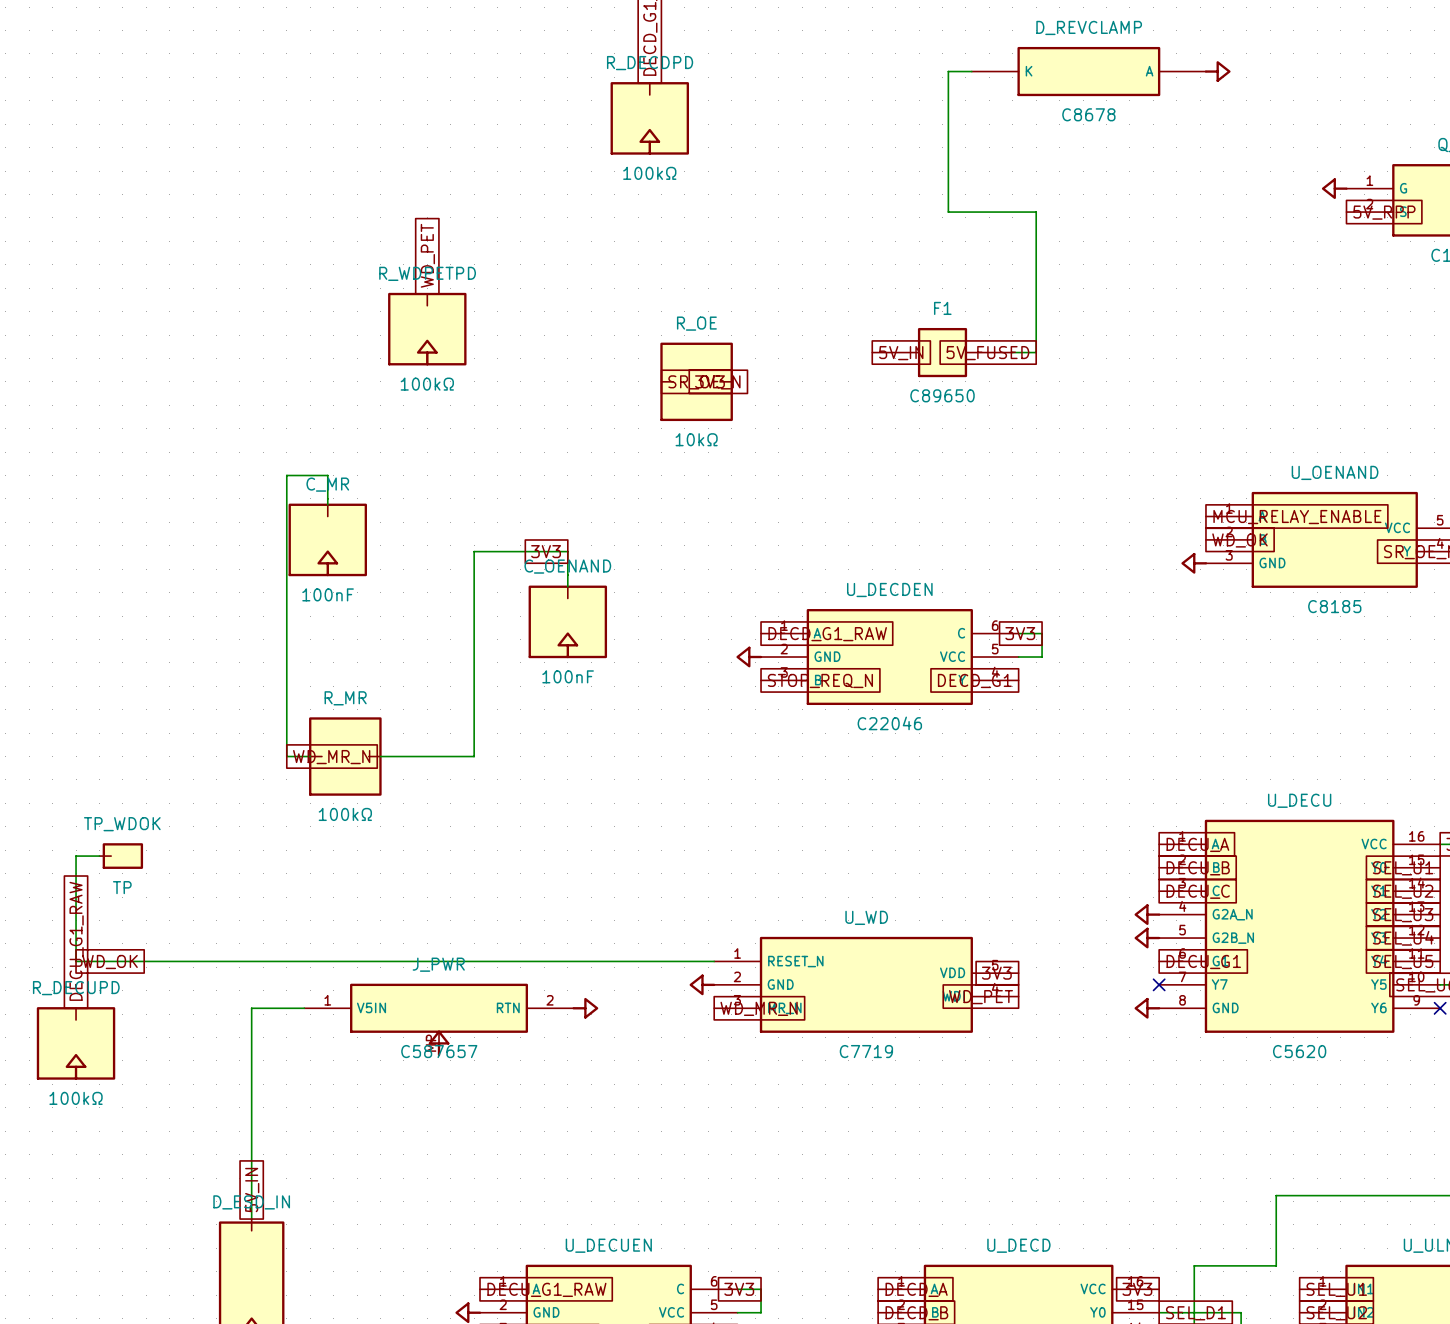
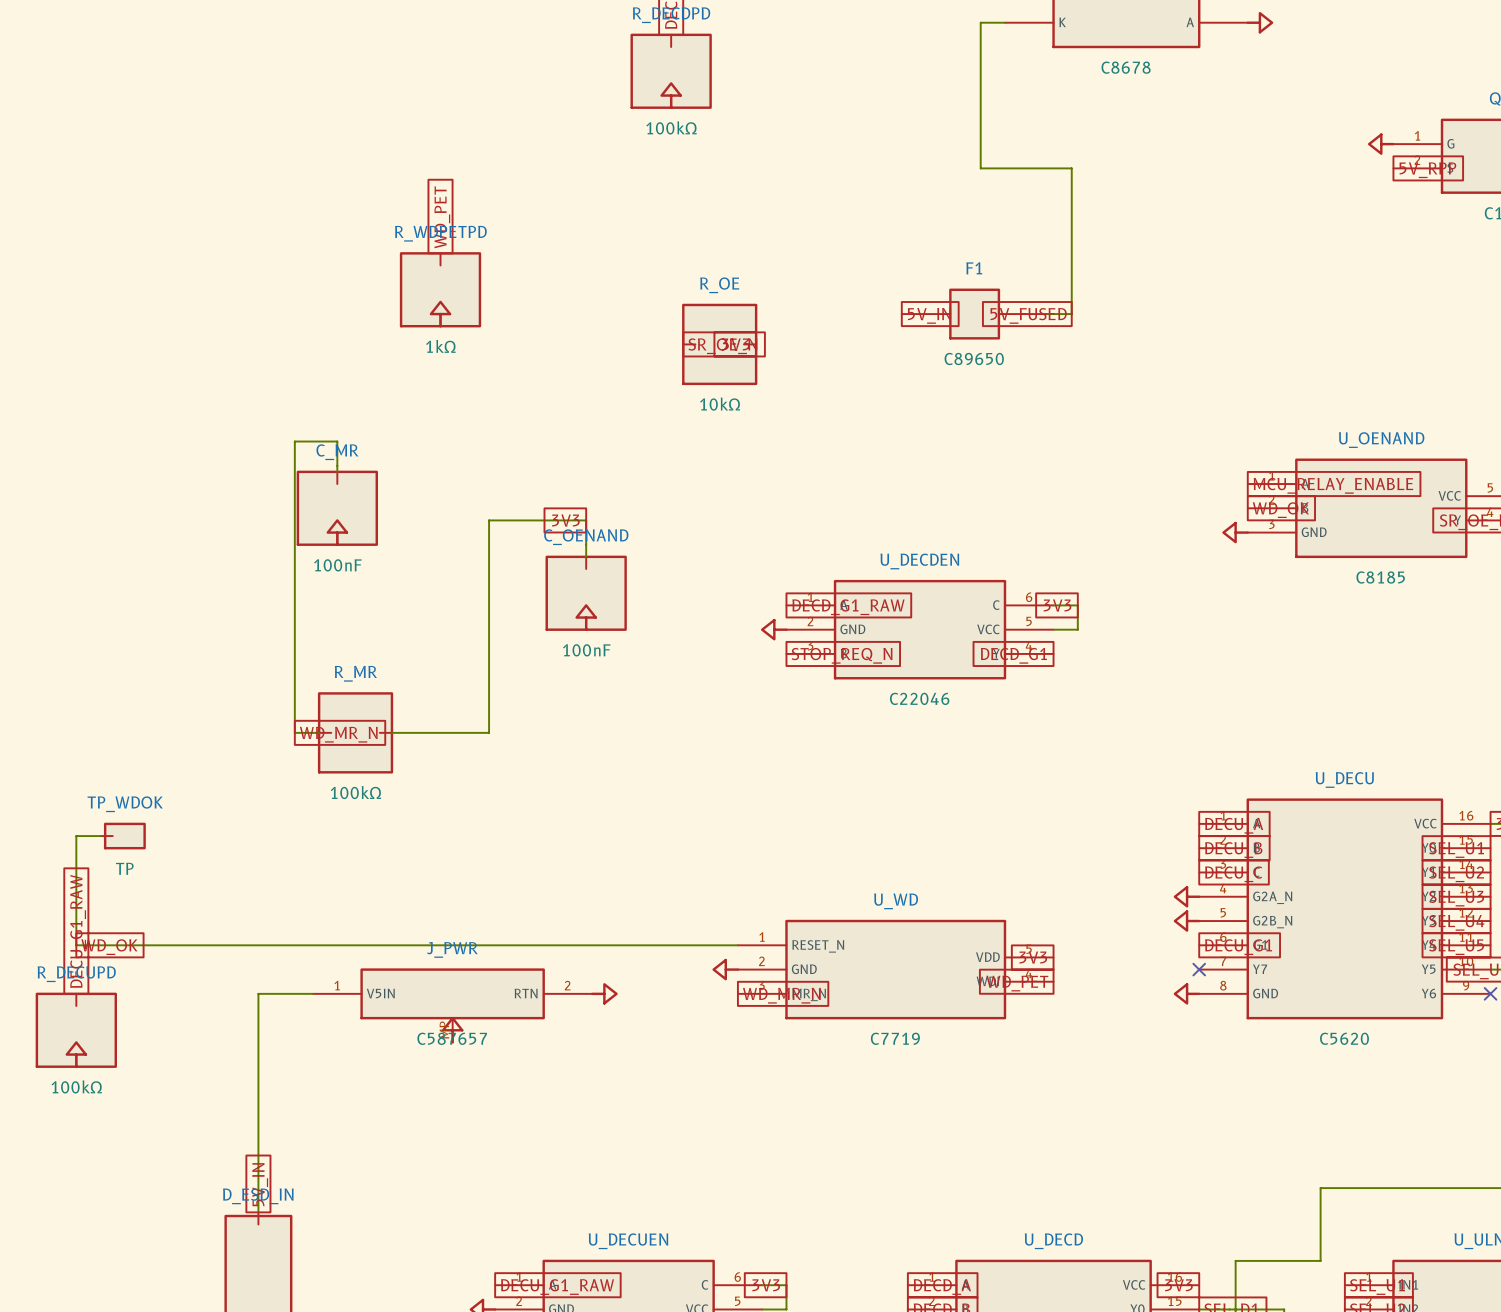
R_WDPETPD value: 100kΩ (427, 384) -> 1kΩ (440, 346)

